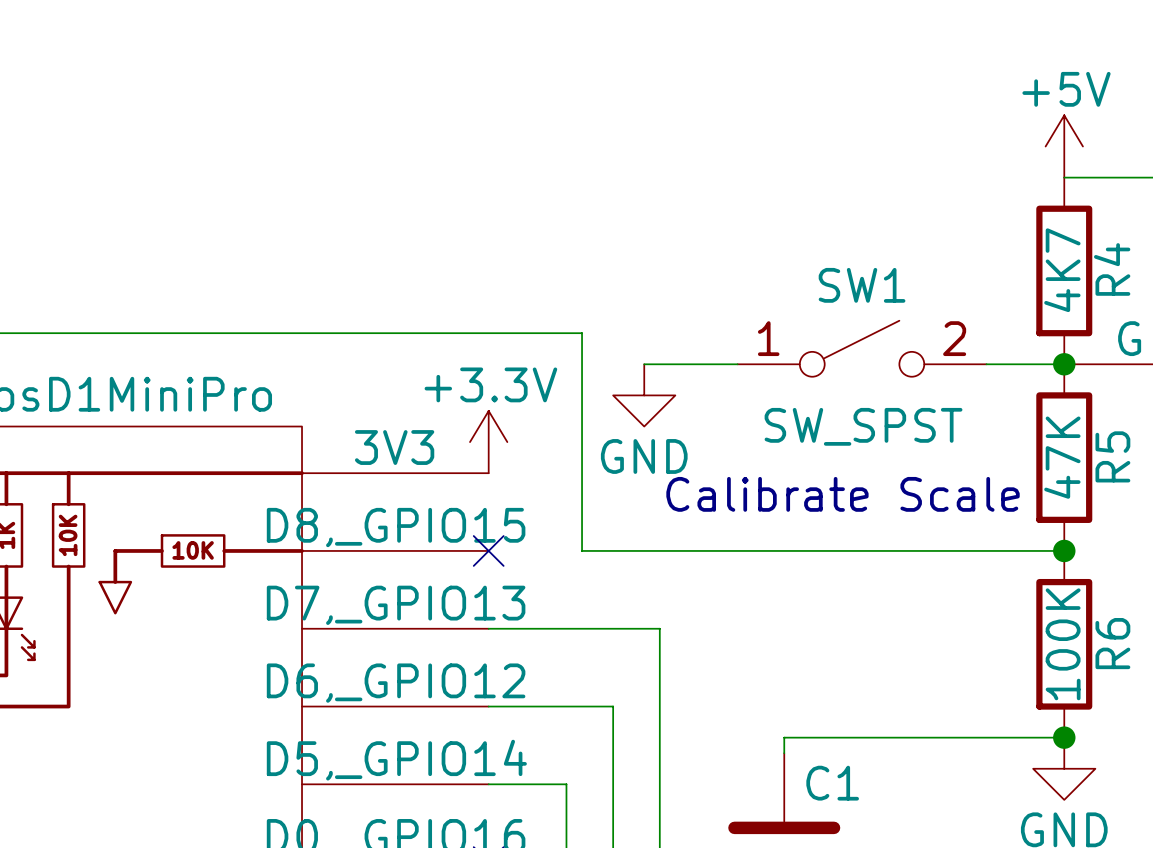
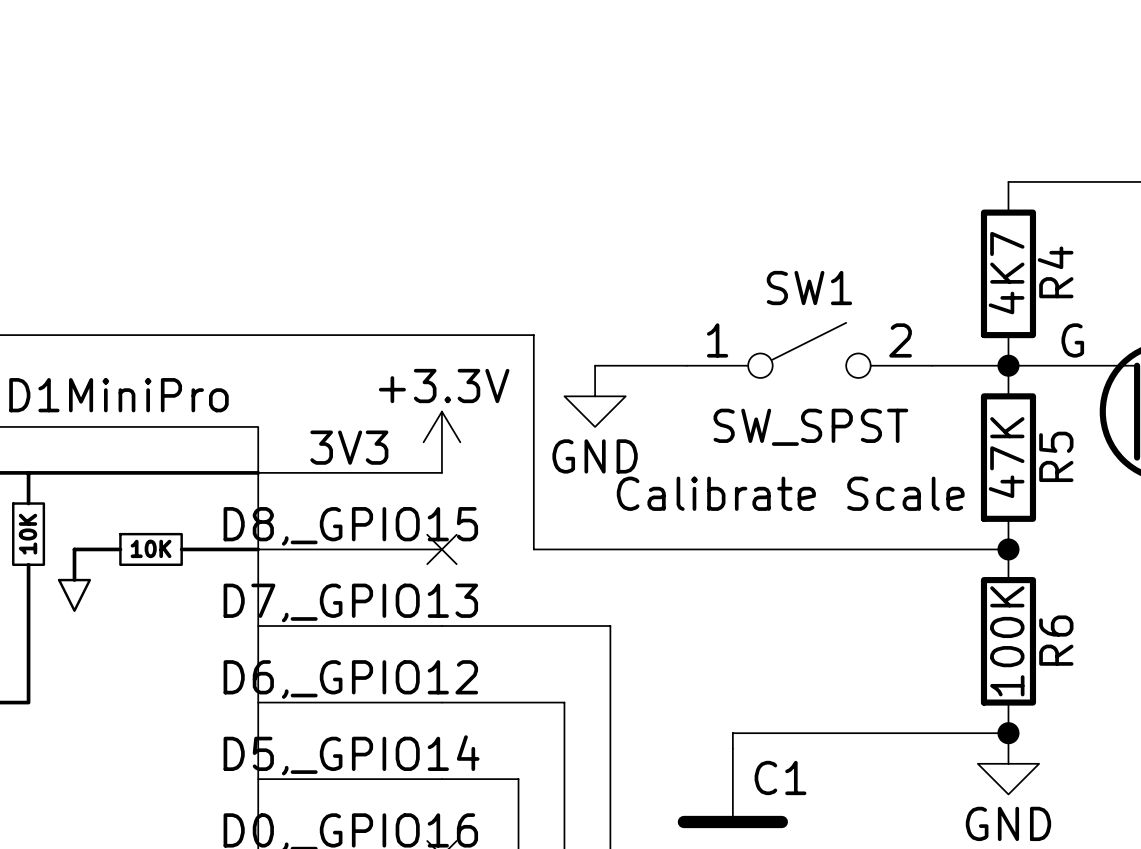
power symbol: +5V (1064, 146) -> none

